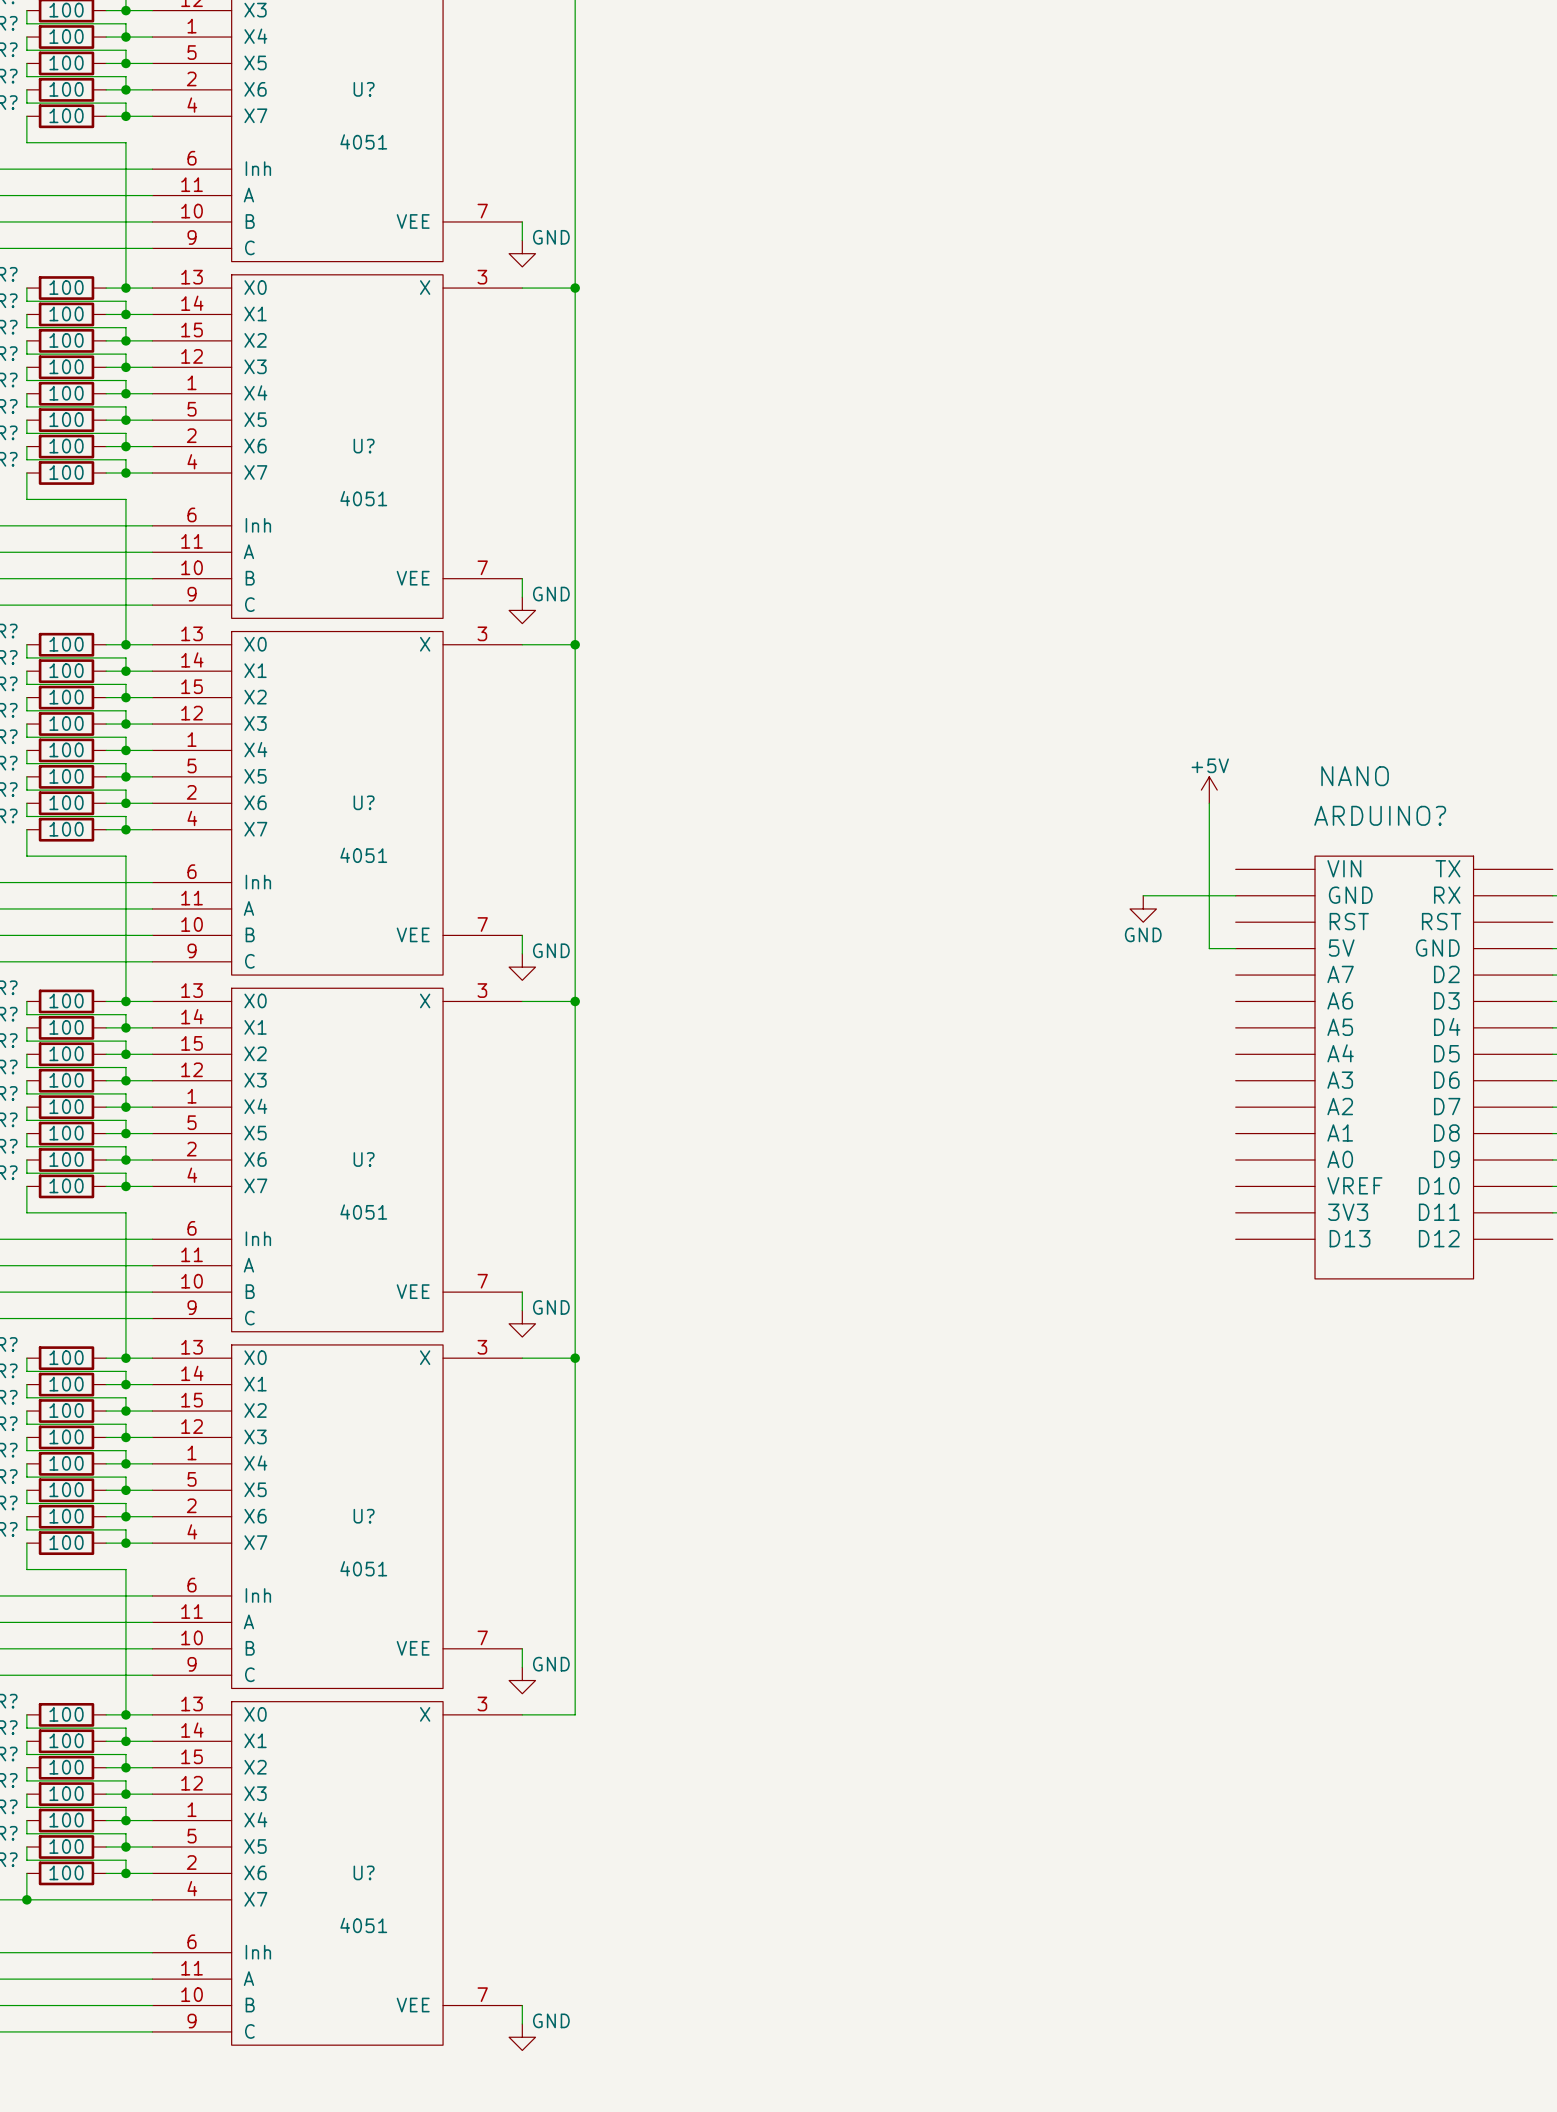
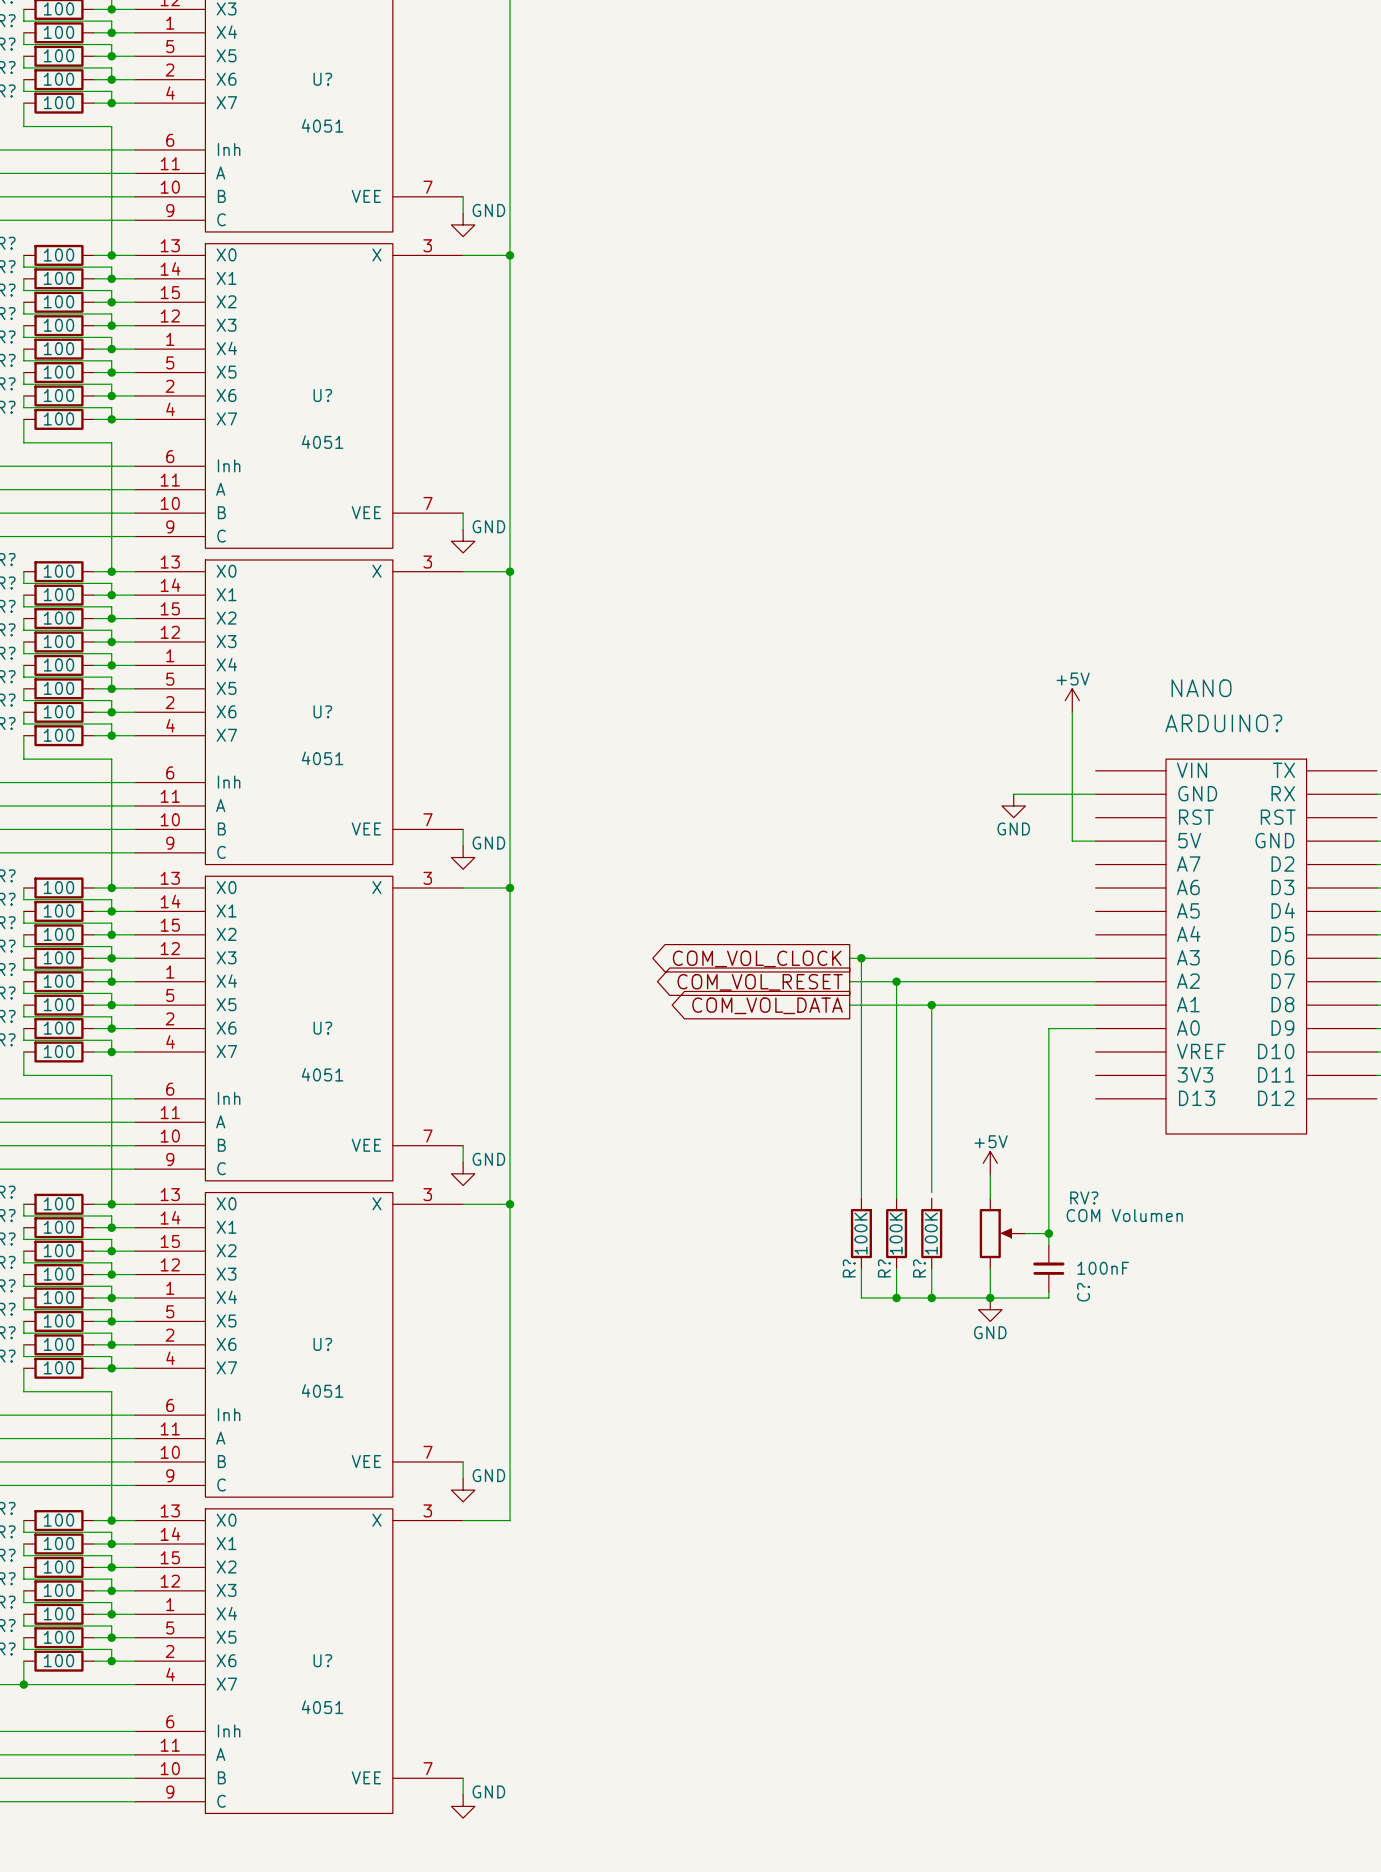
wire: none -> (849, 958) (1095, 958)
wire: none -> (861, 958) (861, 1198)
junction: none -> (861, 958)
global label: none -> COM_VOL_CLOCK (757, 958)
global label: none -> COM_VOL_RESET (760, 982)
wire: none -> (849, 981) (1095, 981)
wire: none -> (896, 981) (896, 1198)
junction: none -> (896, 981)
wire: none -> (849, 1005) (1095, 1005)
wire: none -> (931, 1005) (931, 1192)
junction: none -> (931, 1005)
global label: none -> COM_VOL_DATA (767, 1005)
wire: none -> (1095, 1028) (1048, 1028) (1048, 1245)
power symbol: none -> +5V (990, 1163)
wire: none -> (990, 1174) (990, 1198)
R?: none -> 100K (861, 1233)
R?: none -> 100K (896, 1233)
R?: none -> 100K (931, 1233)
RV?: none -> COM Volumen (1002, 1233)
wire: none -> (1025, 1233) (1048, 1233)
junction: none -> (1048, 1233)
wire: none -> (861, 1268) (861, 1297) (1048, 1297) (1048, 1292)
wire: none -> (896, 1268) (896, 1297)
wire: none -> (931, 1268) (931, 1297)
wire: none -> (990, 1268) (990, 1297)
C?: none -> 100nF (1048, 1268)
junction: none -> (896, 1297)
junction: none -> (931, 1297)
junction: none -> (990, 1297)
power symbol: none -> GND (990, 1309)

